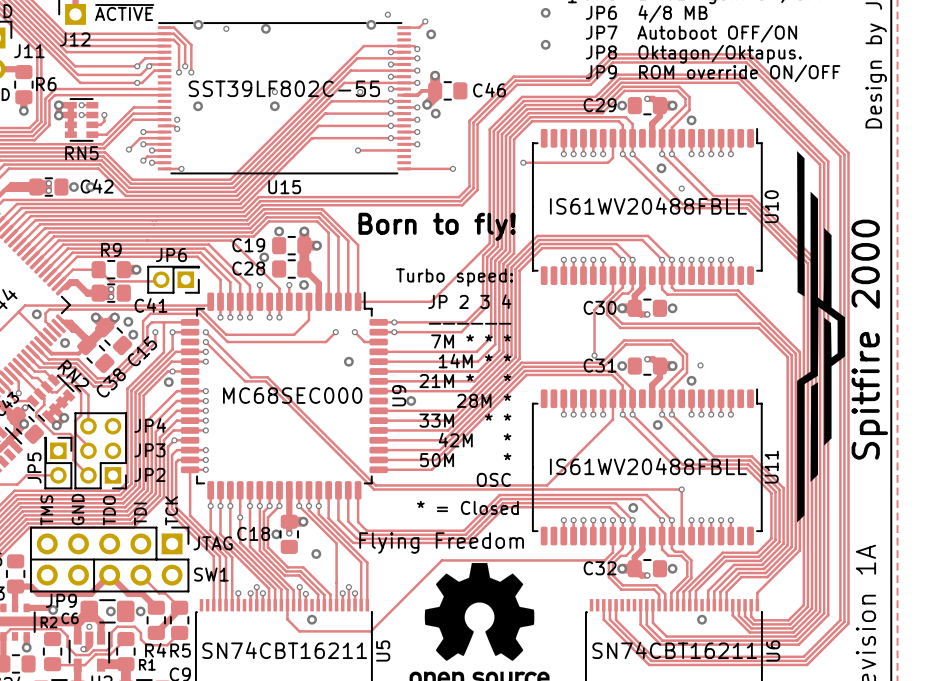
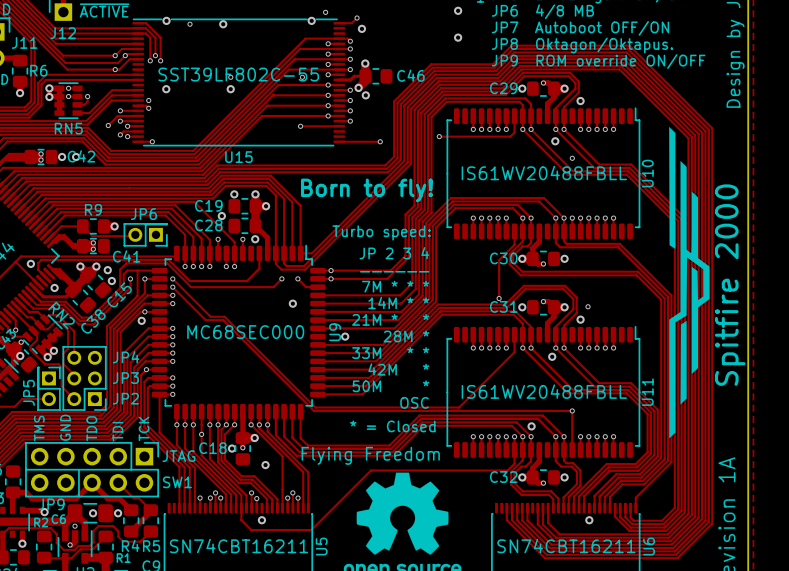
track: (489, 195) (489, 243) (431, 301) (371, 301) -> (411, 163) (305, 269) (281, 269) (275, 264) (275, 253)
track: none -> (284, 253) (284, 263) (286, 266) (304, 266) (407, 162) (407, 107) (436, 77) (498, 77) (517, 59) (623, 59) (698, 134) (698, 517) (671, 544) (551, 544) (527, 520) (527, 508)
track: none -> (311, 253) (404, 160) (404, 105) (435, 74) (497, 74) (515, 55) (625, 55) (702, 132) (702, 519) (673, 547) (549, 547) (522, 520) (522, 508)

